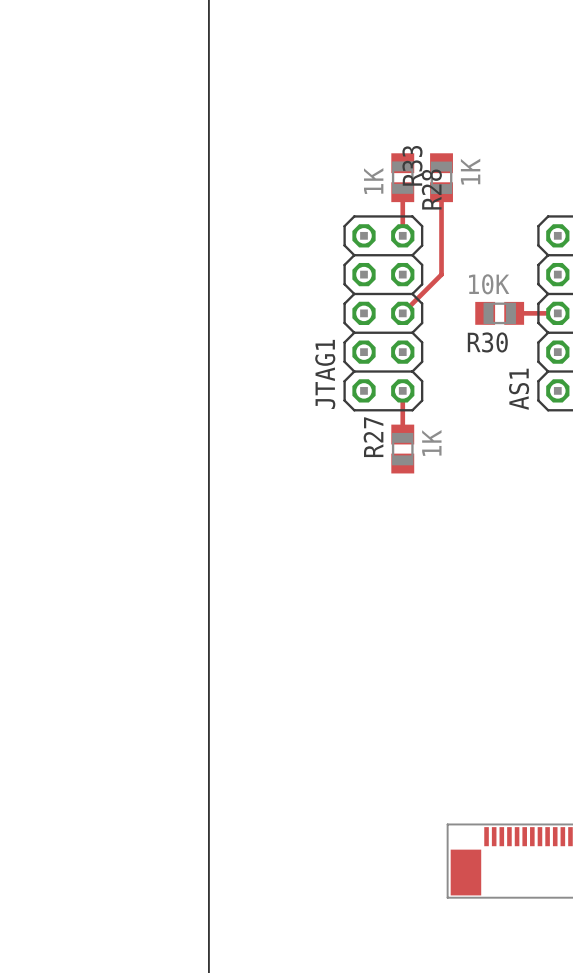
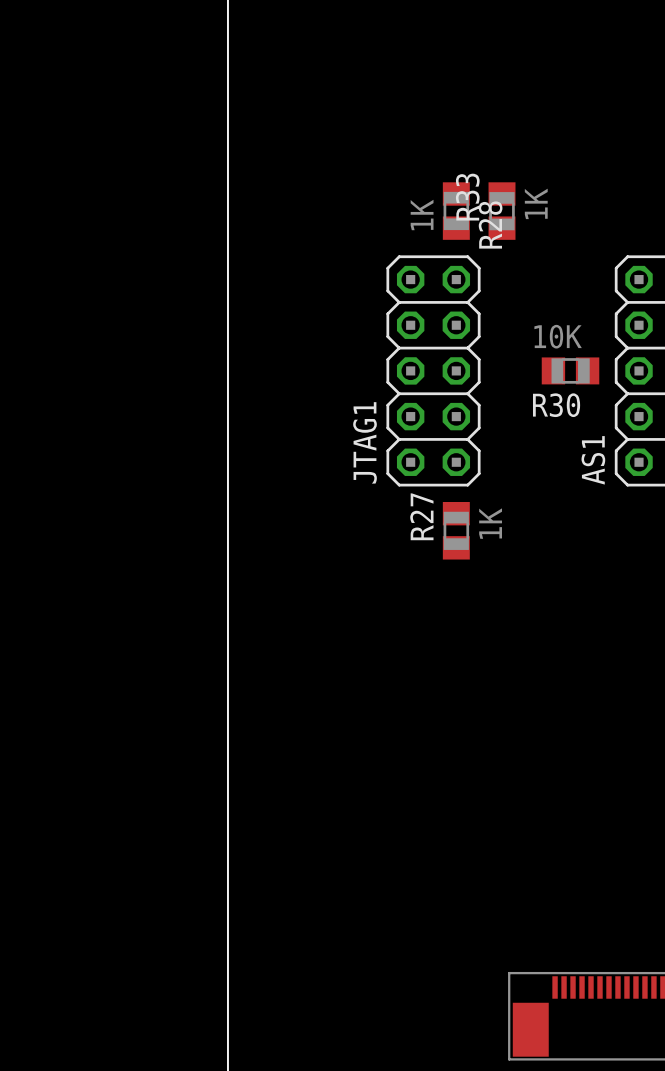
track: (402, 192) (402, 235) -> none
track: (441, 192) (441, 274) (402, 313) -> none
track: (514, 313) (557, 313) -> none
track: (402, 390) (402, 434) -> none

